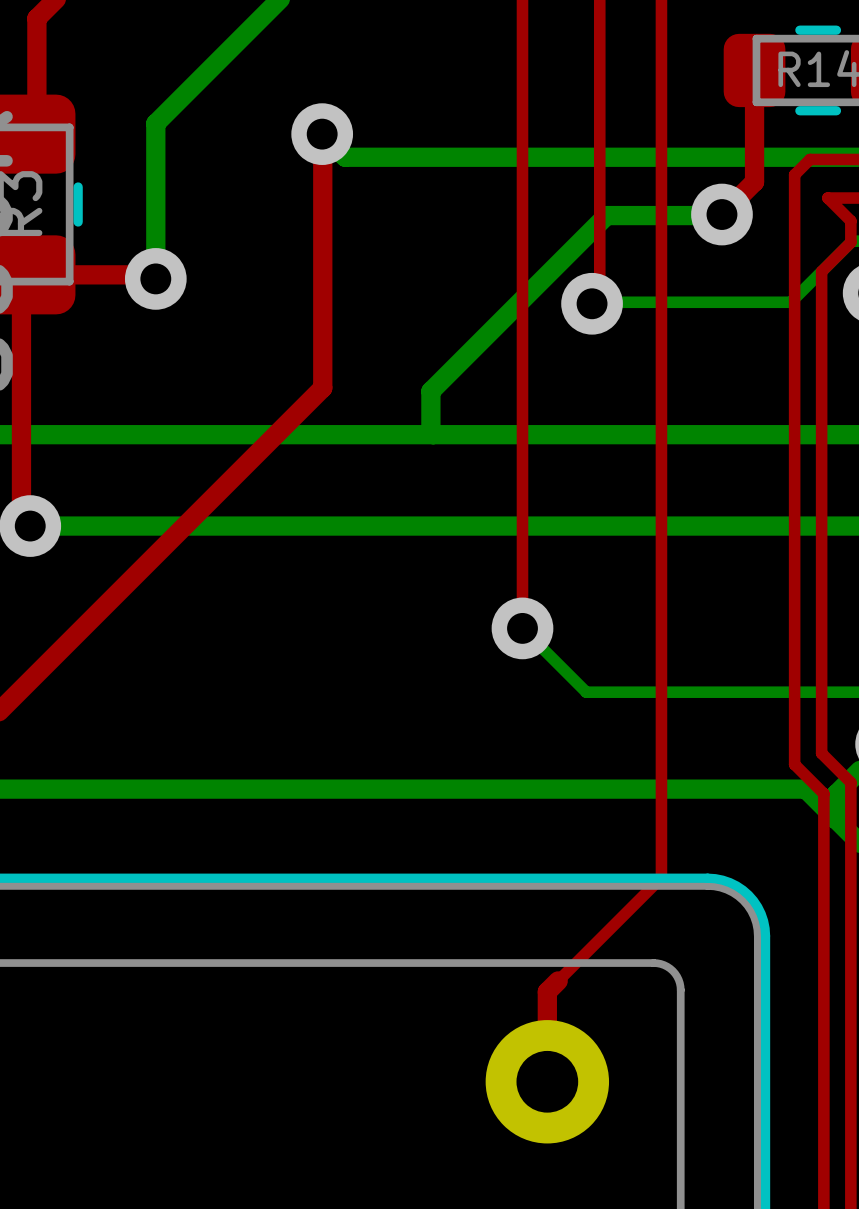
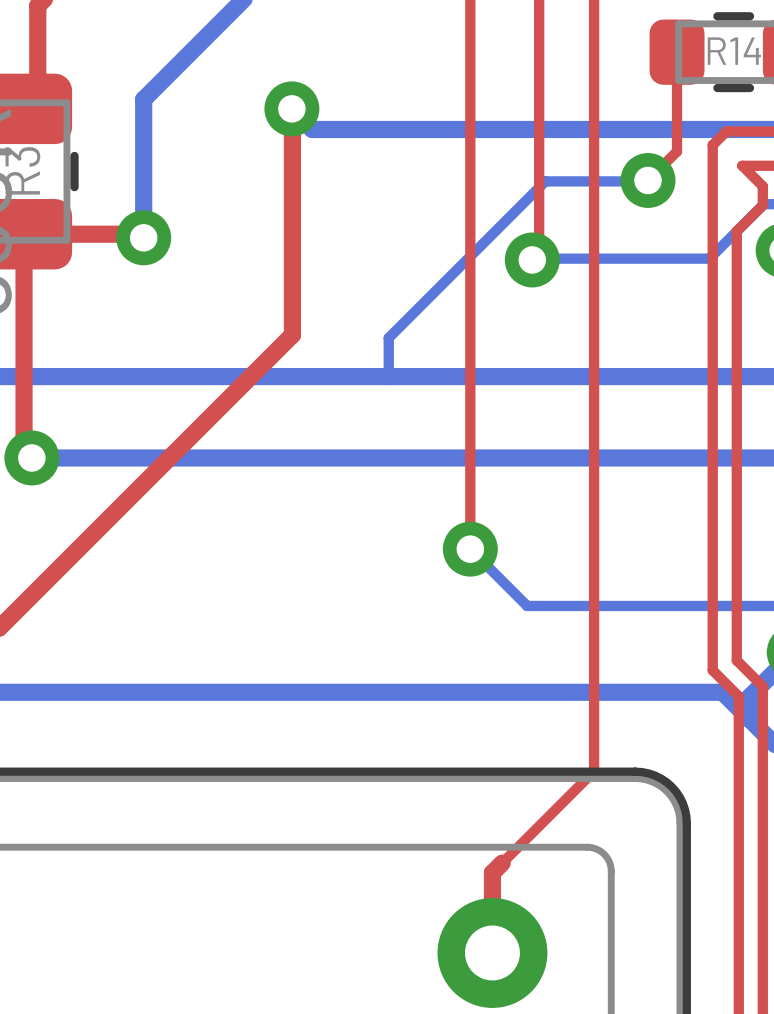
top track width: thick (754, 70) (754, 181) (721, 214) -> thin (677, 52) (677, 151) (648, 180)
bottom track width: thick (720, 215) (606, 215) (430, 391) (430, 432) (433, 434) -> thin (647, 181) (545, 181) (388, 337) (388, 374) (390, 376)

